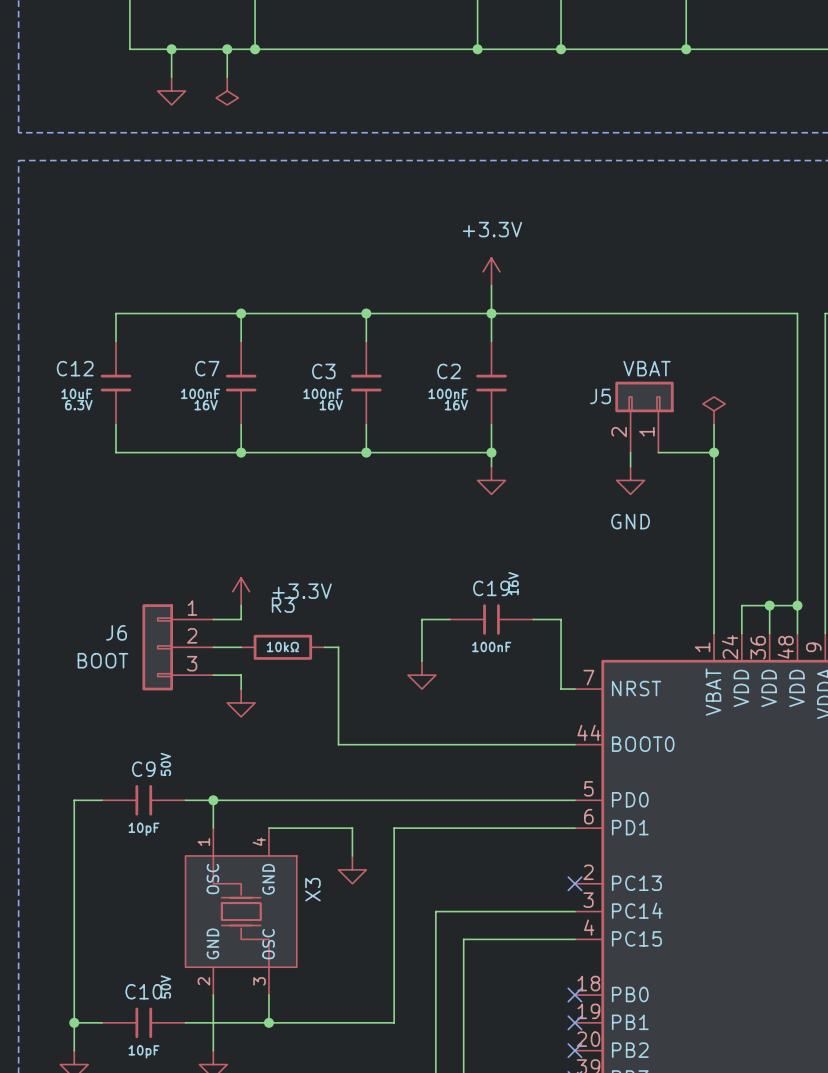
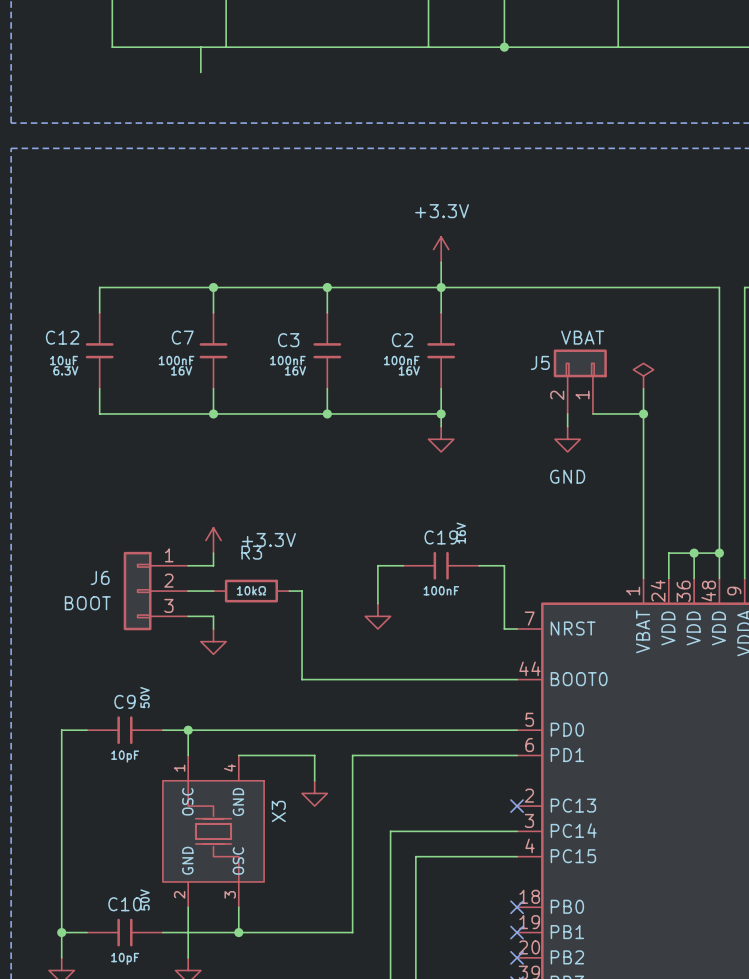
wire: (171, 49) (171, 77) -> none
junction: (171, 49) -> none
junction: (227, 49) -> none
junction: (255, 49) -> none
junction: (477, 49) -> none
junction: (686, 49) -> none
power symbol: (171, 91) -> none
power symbol: (227, 91) -> none

